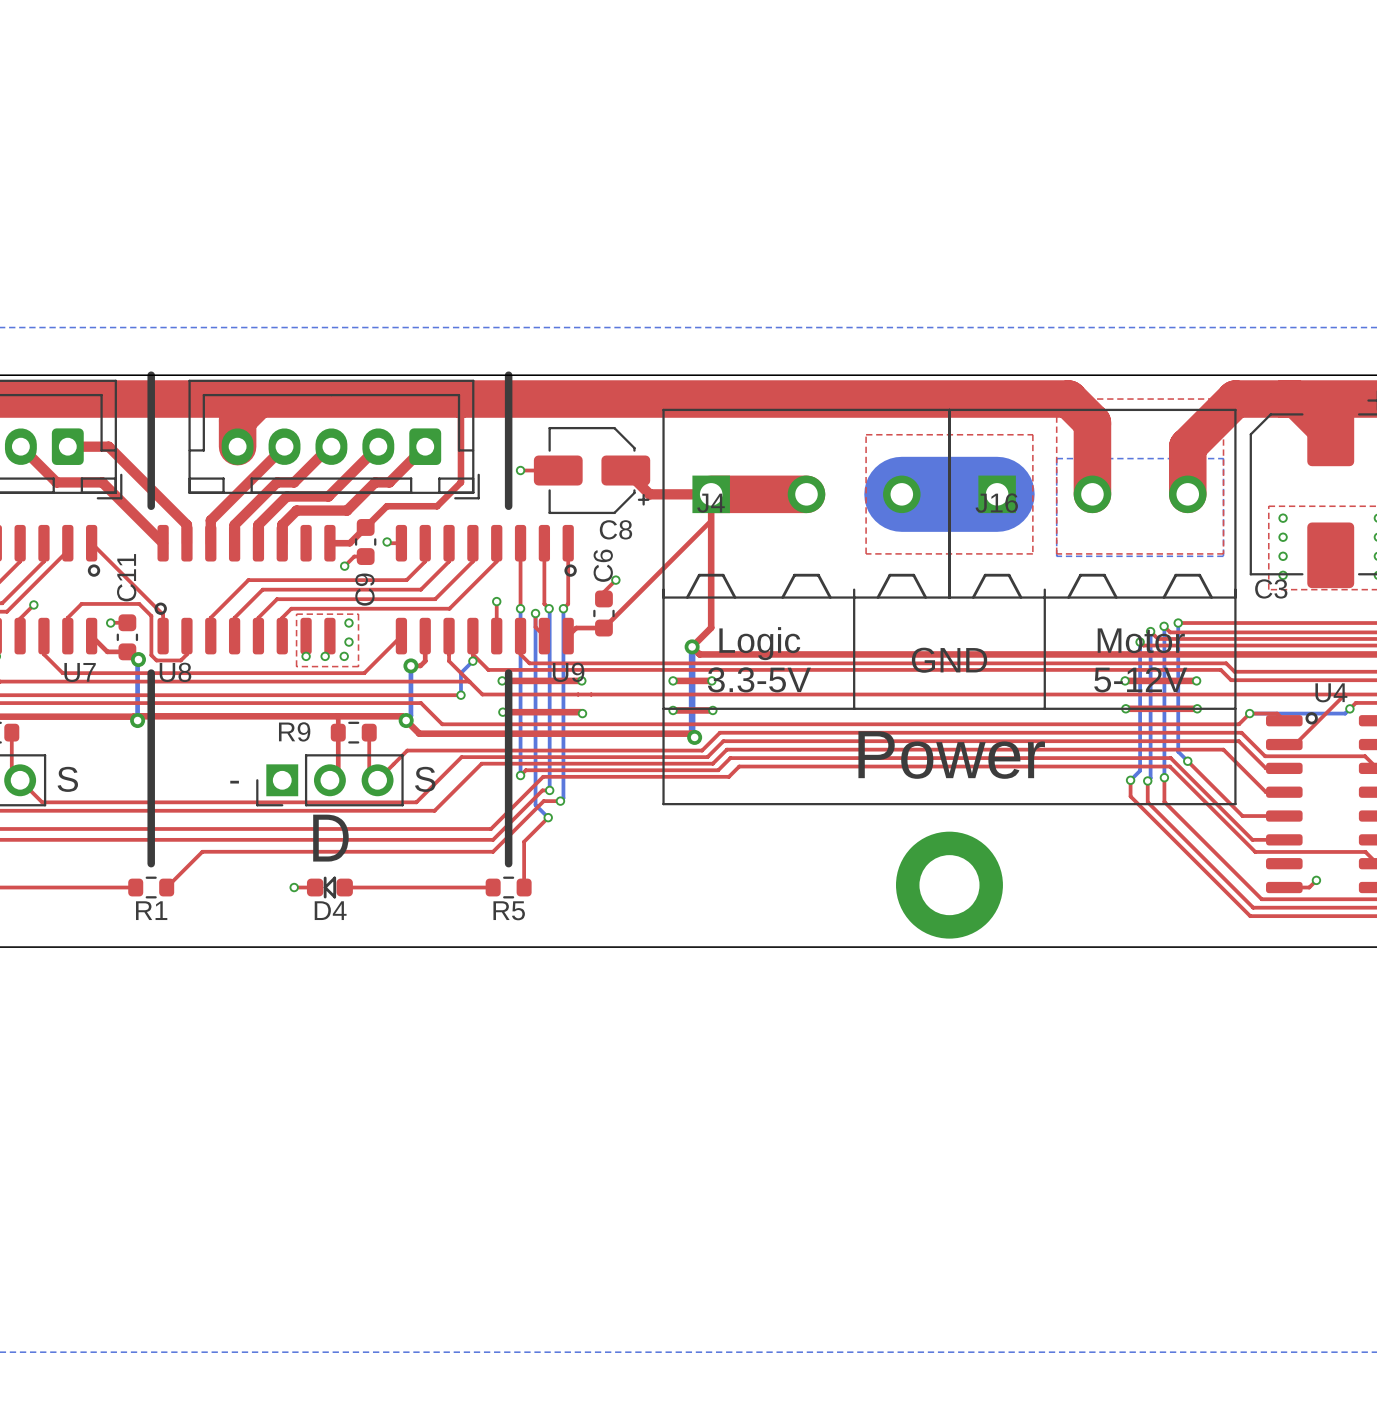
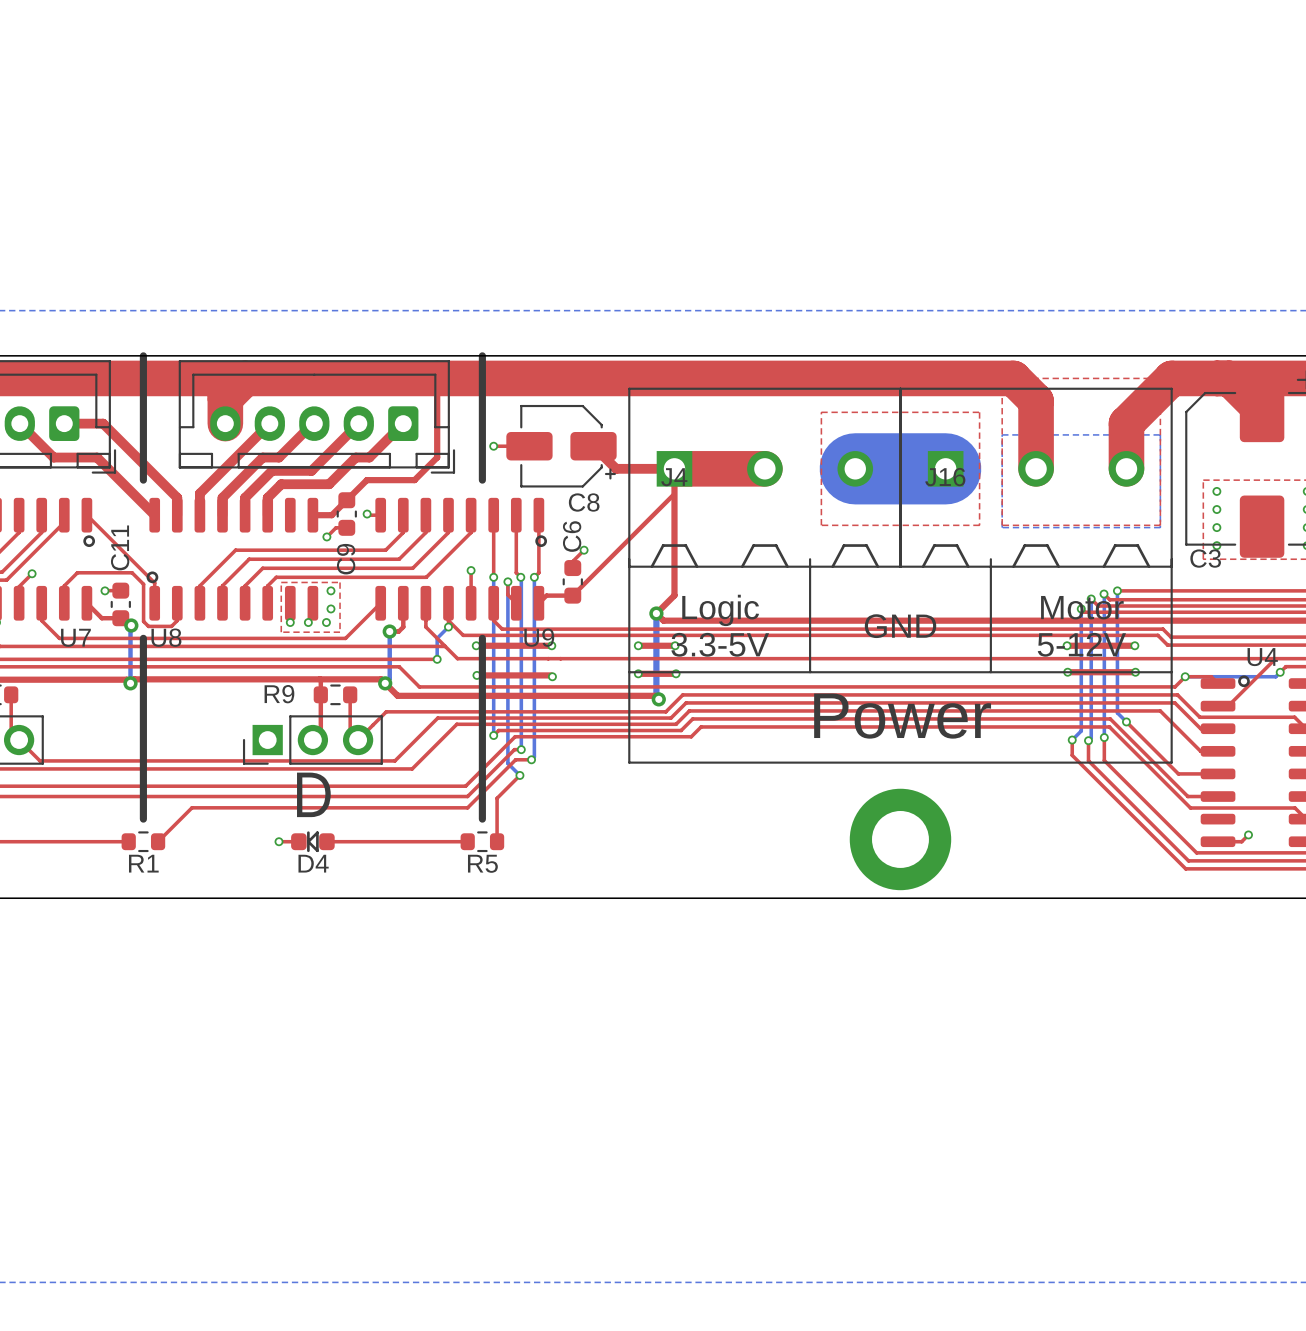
text: S (67, 779) -> none
text: S (425, 779) -> none
text: - (234, 782) -> none

